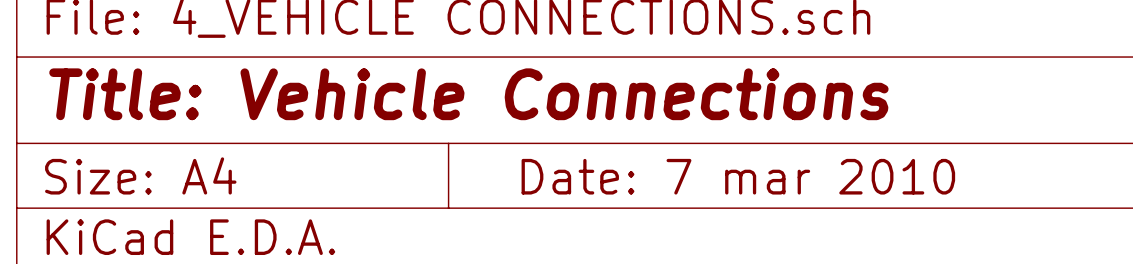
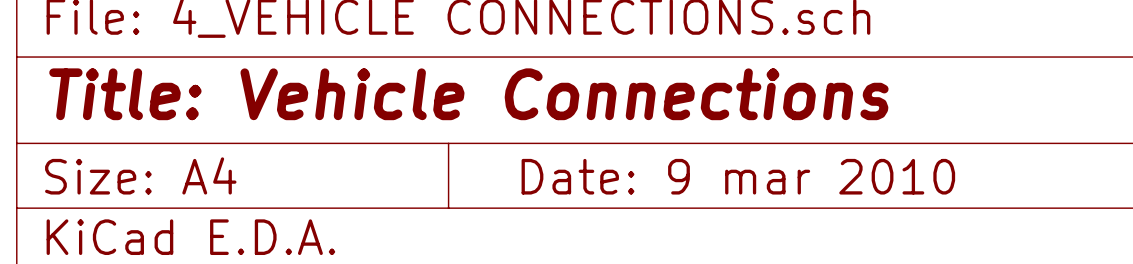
title block: Date: 7 mar 2010 (738, 176) -> Date: 9 mar 2010 (738, 176)

